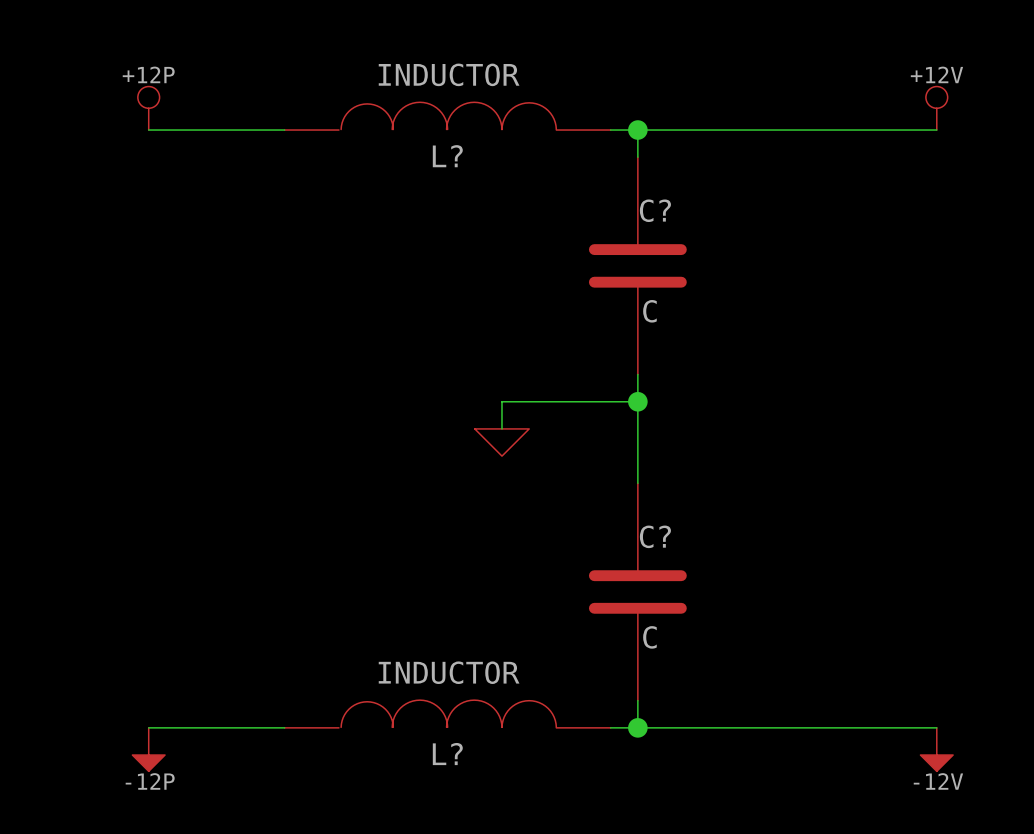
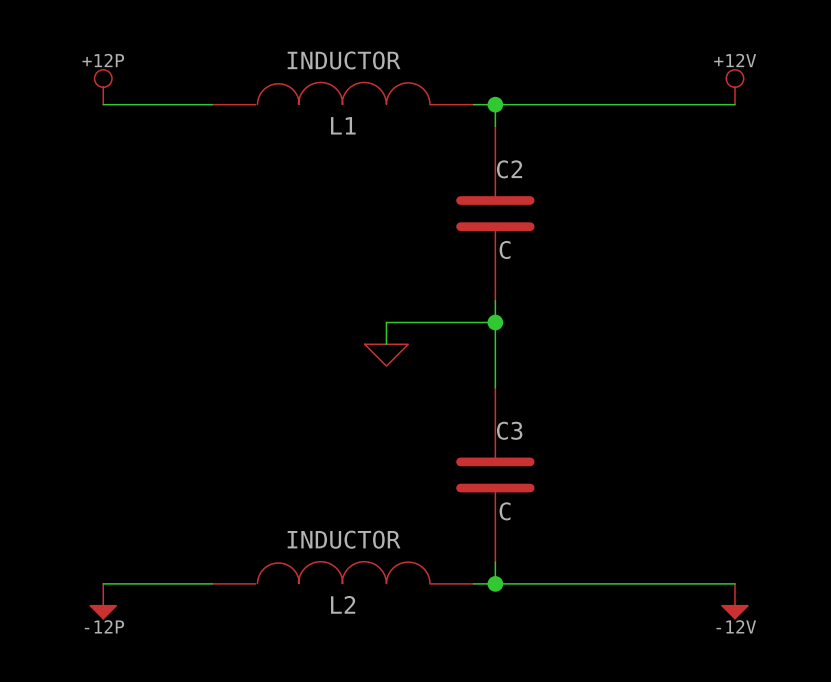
L? name: L? (447, 156) -> L1 (343, 125)
C? name: C? (655, 210) -> C2 (509, 169)
C? name: C? (655, 536) -> C3 (509, 430)
L? name: L? (447, 754) -> L2 (343, 604)

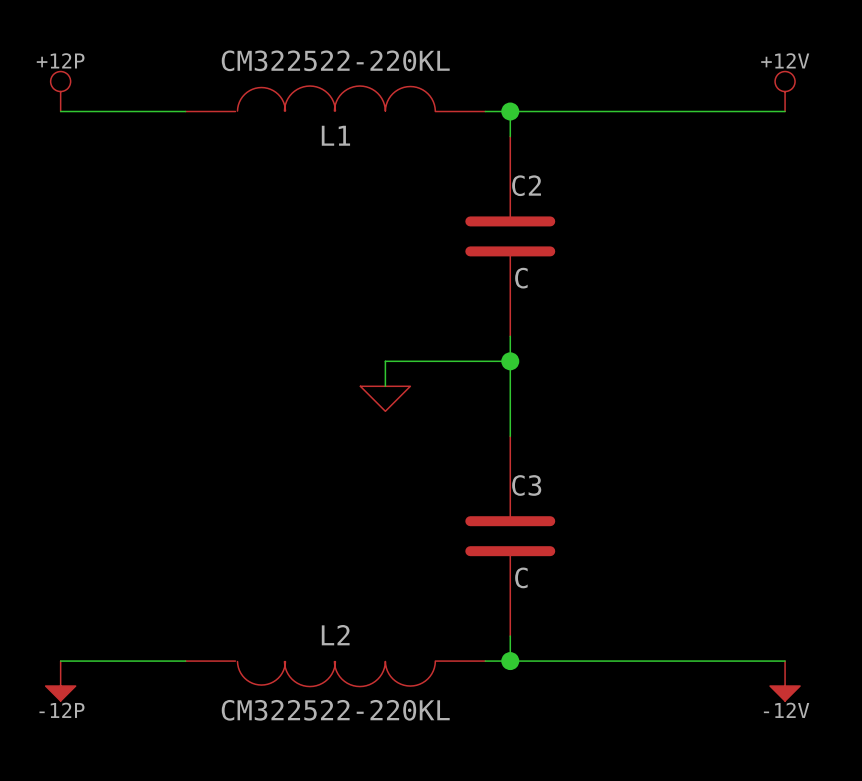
L1 value: INDUCTOR (344, 60) -> CM322522-220KL (335, 60)
L2 value: INDUCTOR (344, 539) -> CM322522-220KL (335, 710)
L2 flip: as is (343, 572) -> up-down (336, 674)

